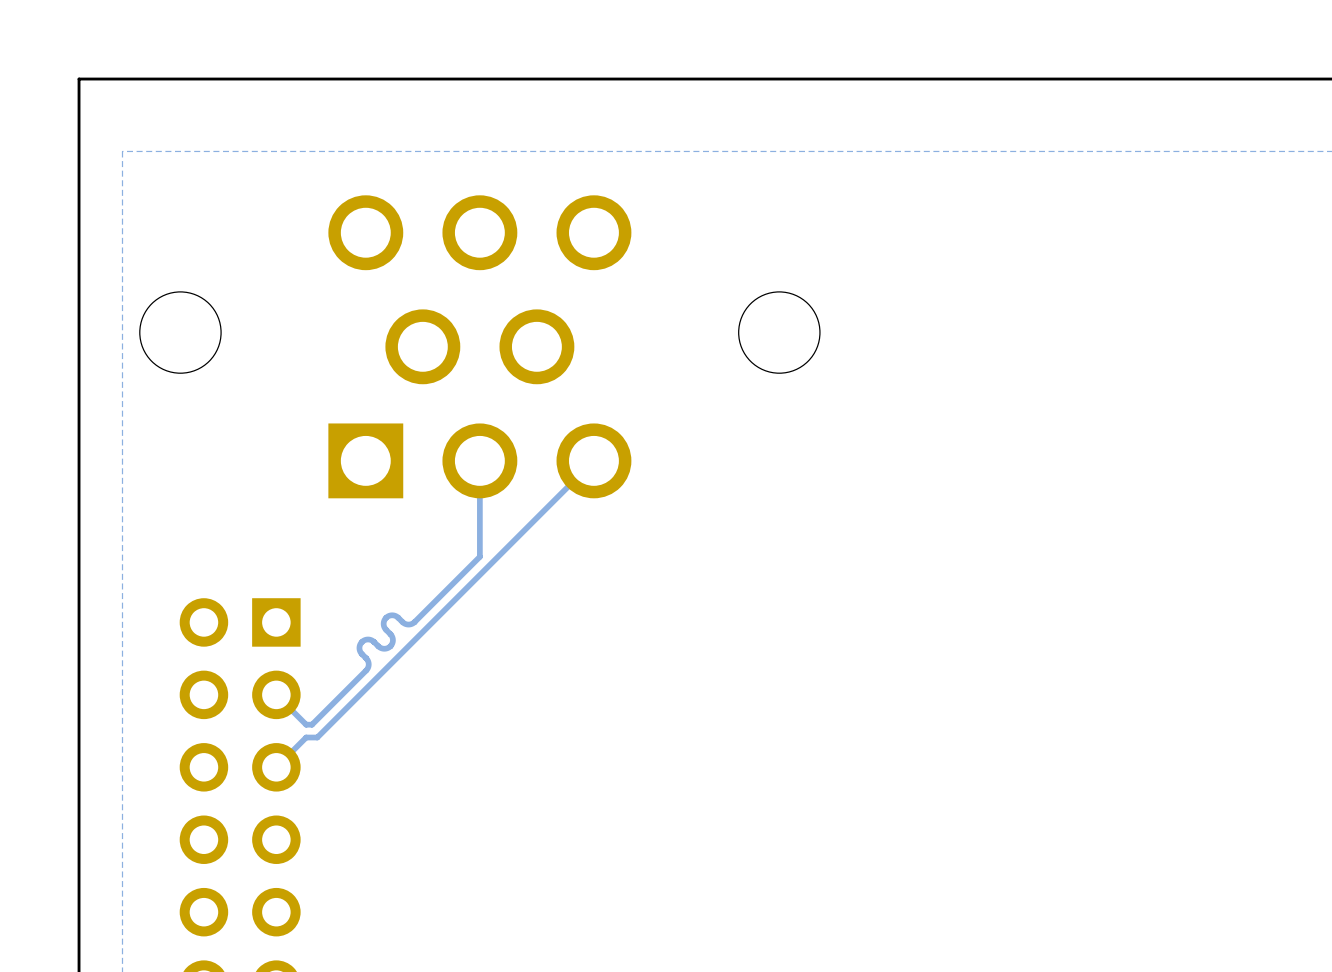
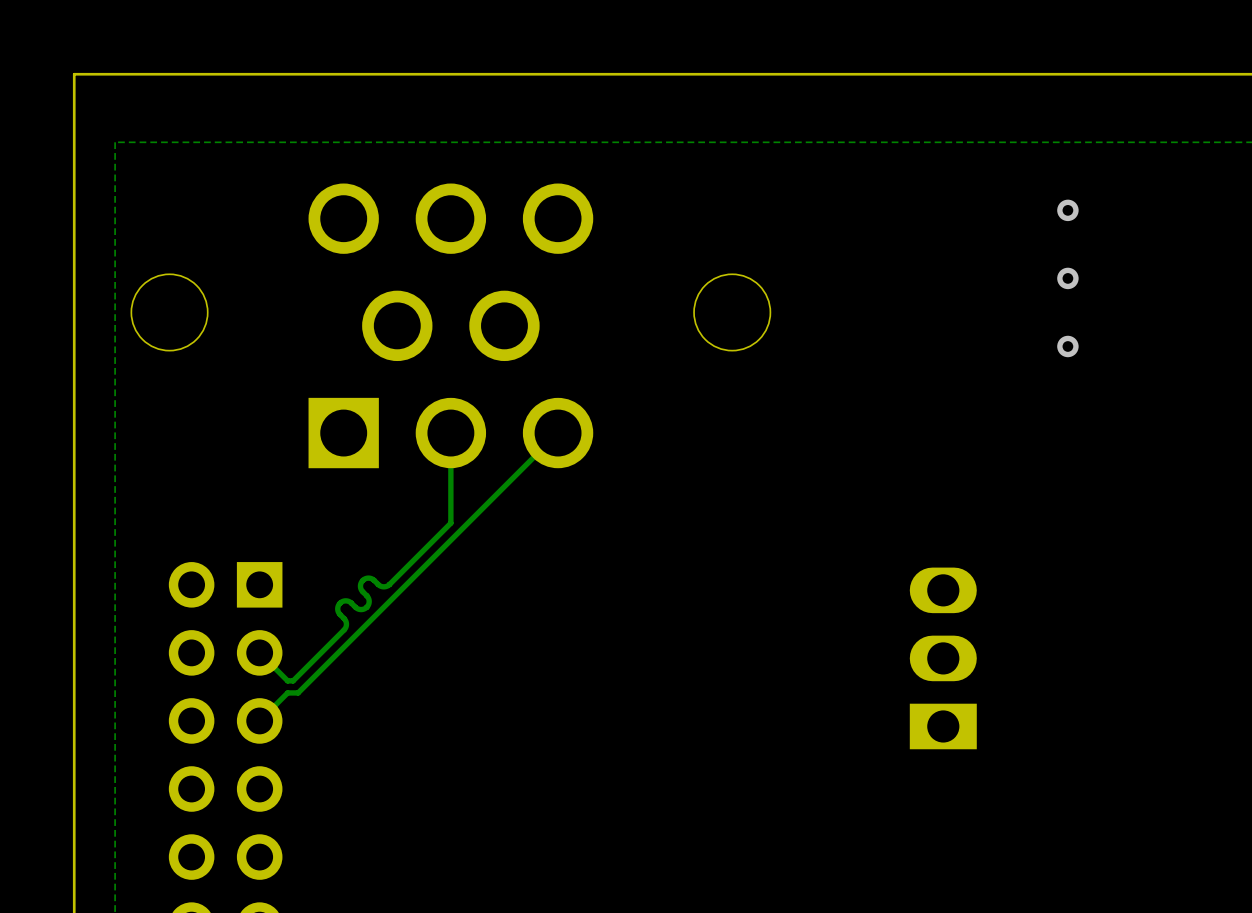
via: none -> (1067, 210)
via: none -> (1067, 278)
via: none -> (1067, 346)
part: none -> (943, 658)

